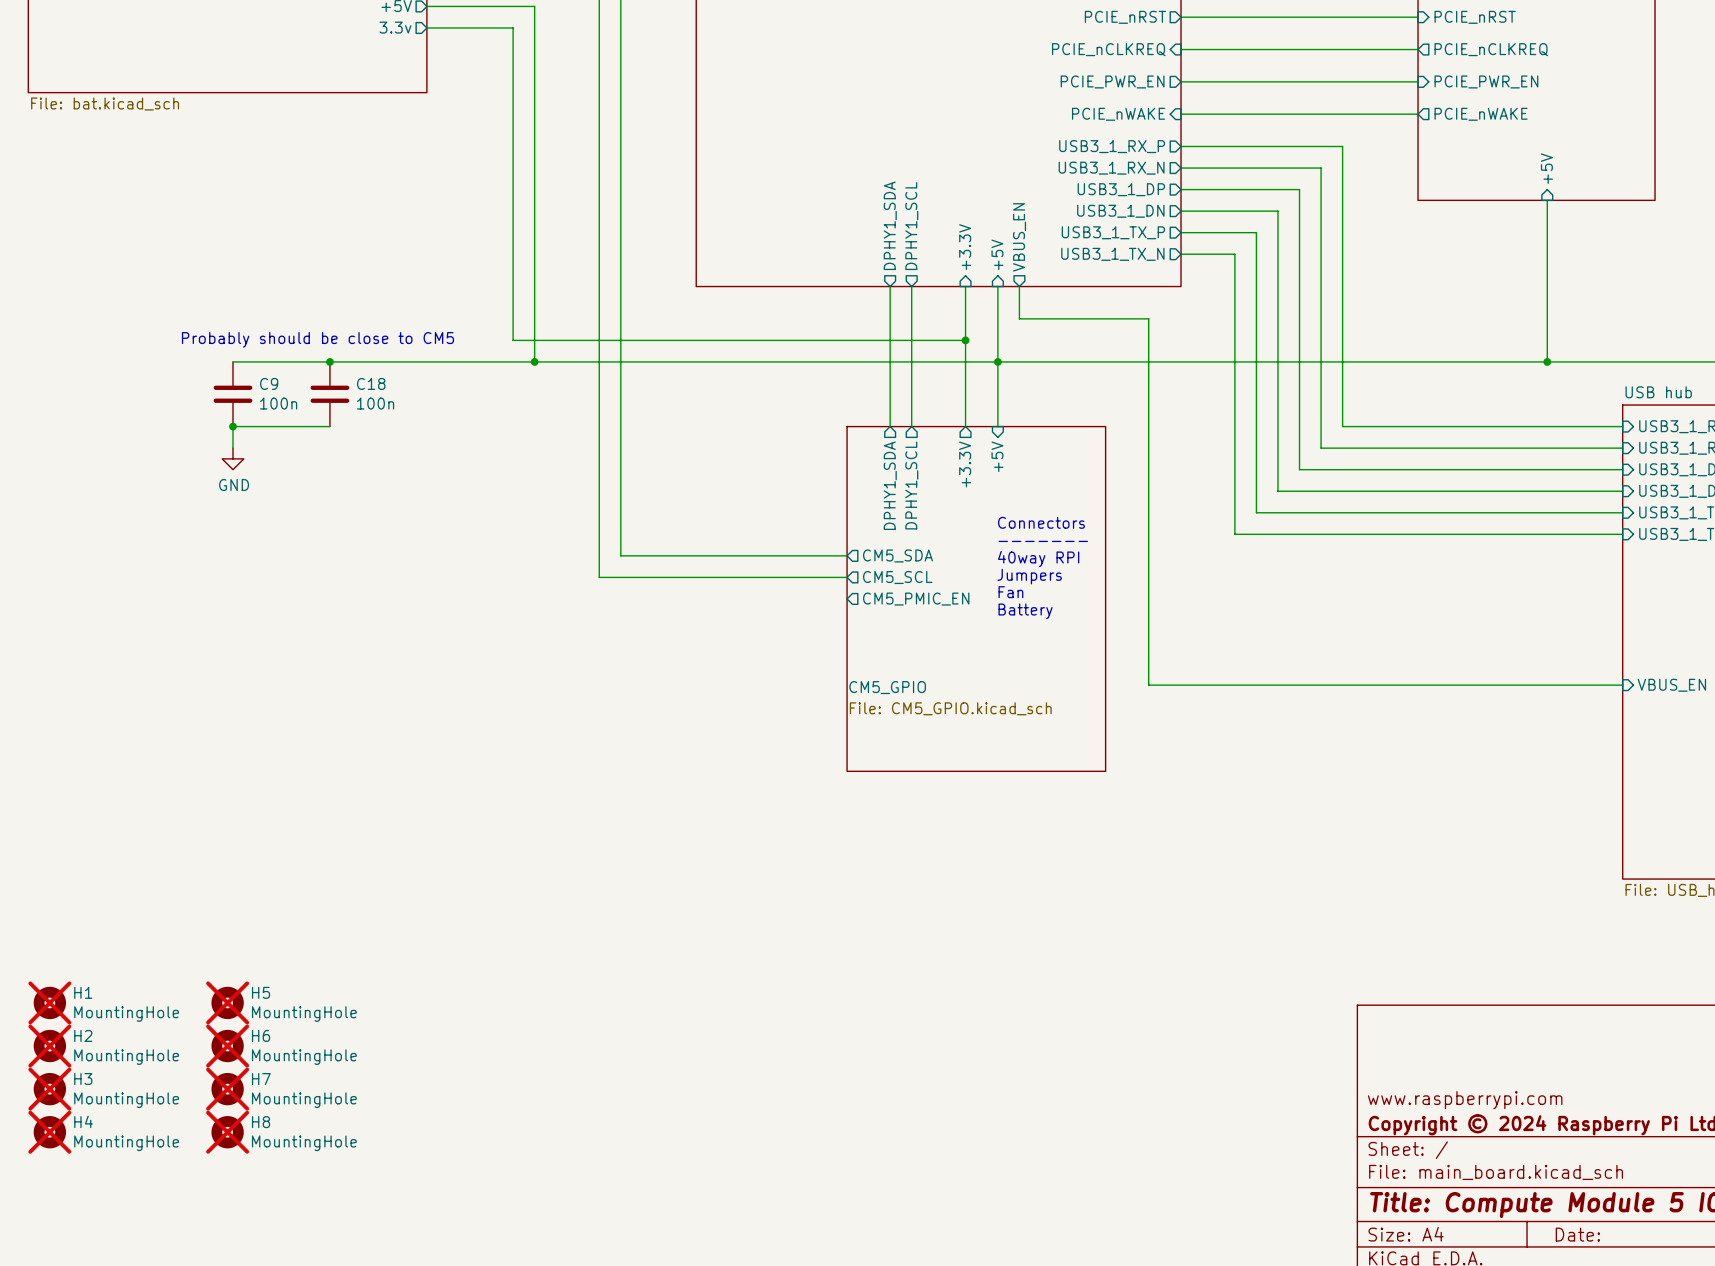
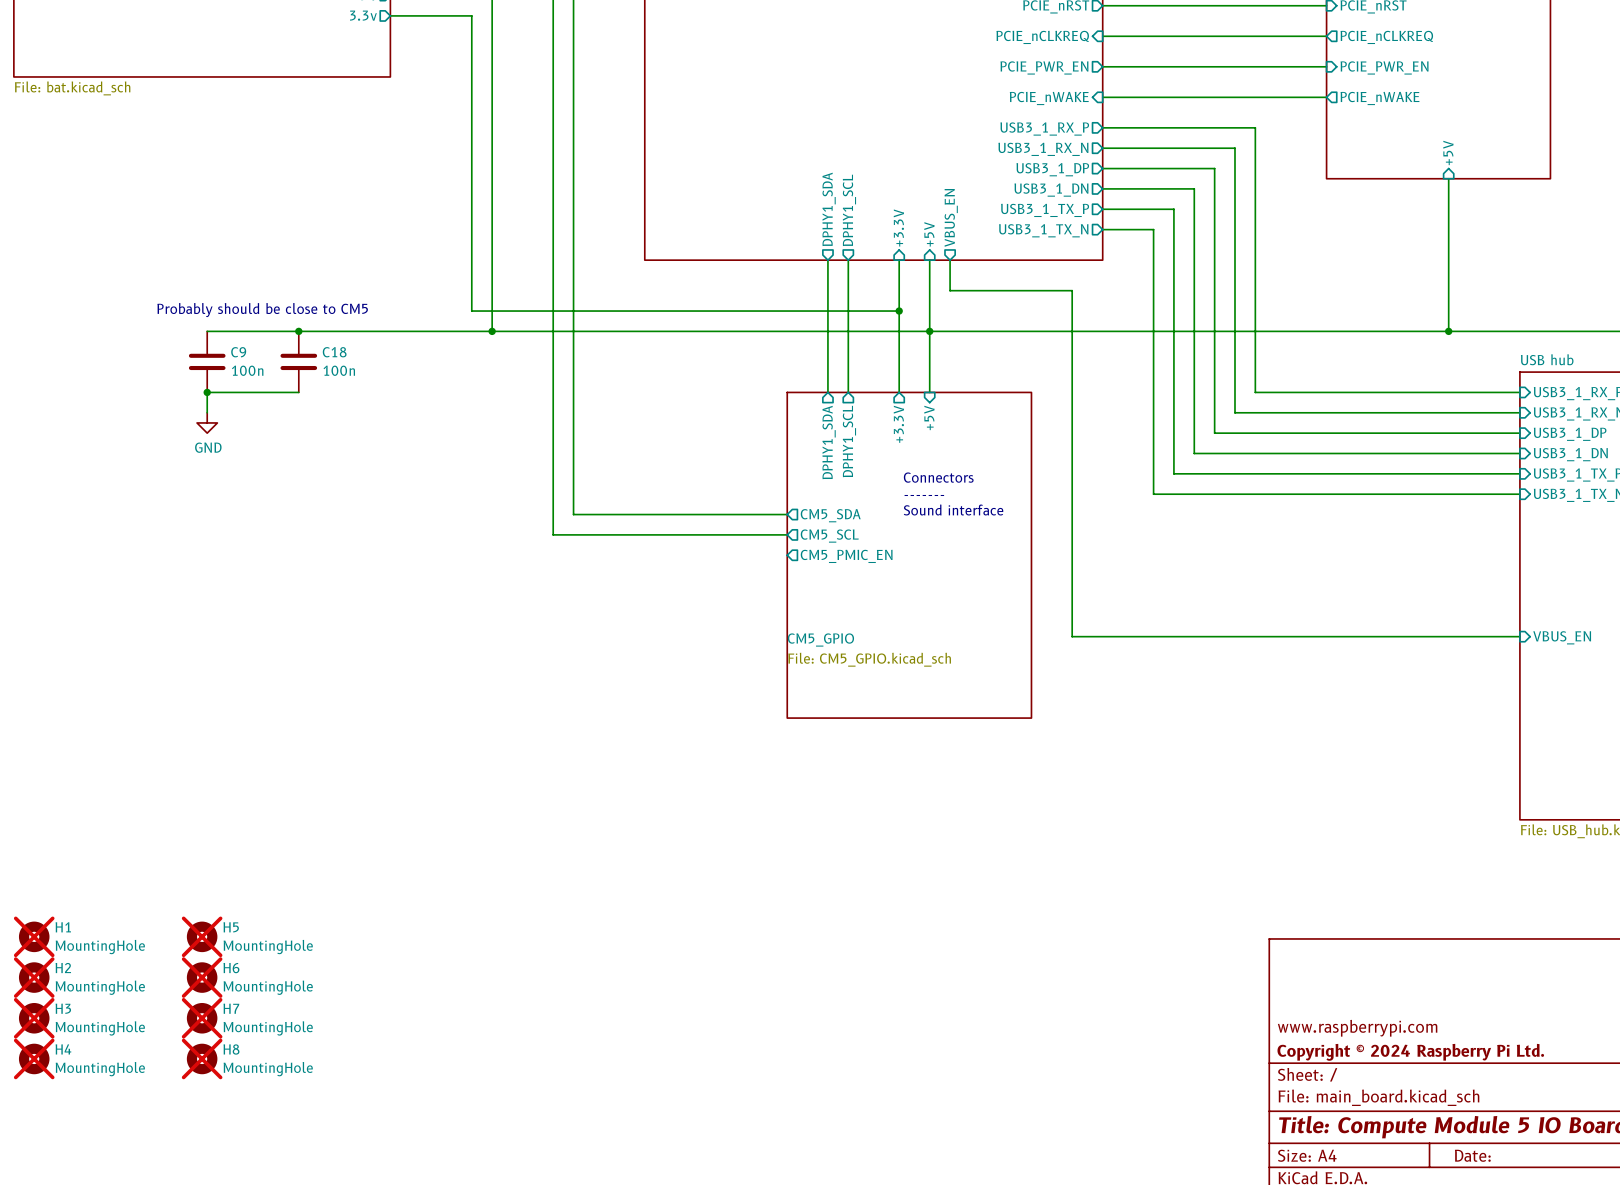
text position: Connectors (1041, 522) -> Connectors (938, 477)
text position: ------- (1043, 541) -> ------- (924, 495)
text: none -> Sound interface (953, 510)
text: 40way RPI (1038, 559) -> none
text: Jumpers (1029, 576) -> none
text: Fan (1010, 592) -> none
text: Battery (1025, 611) -> none

